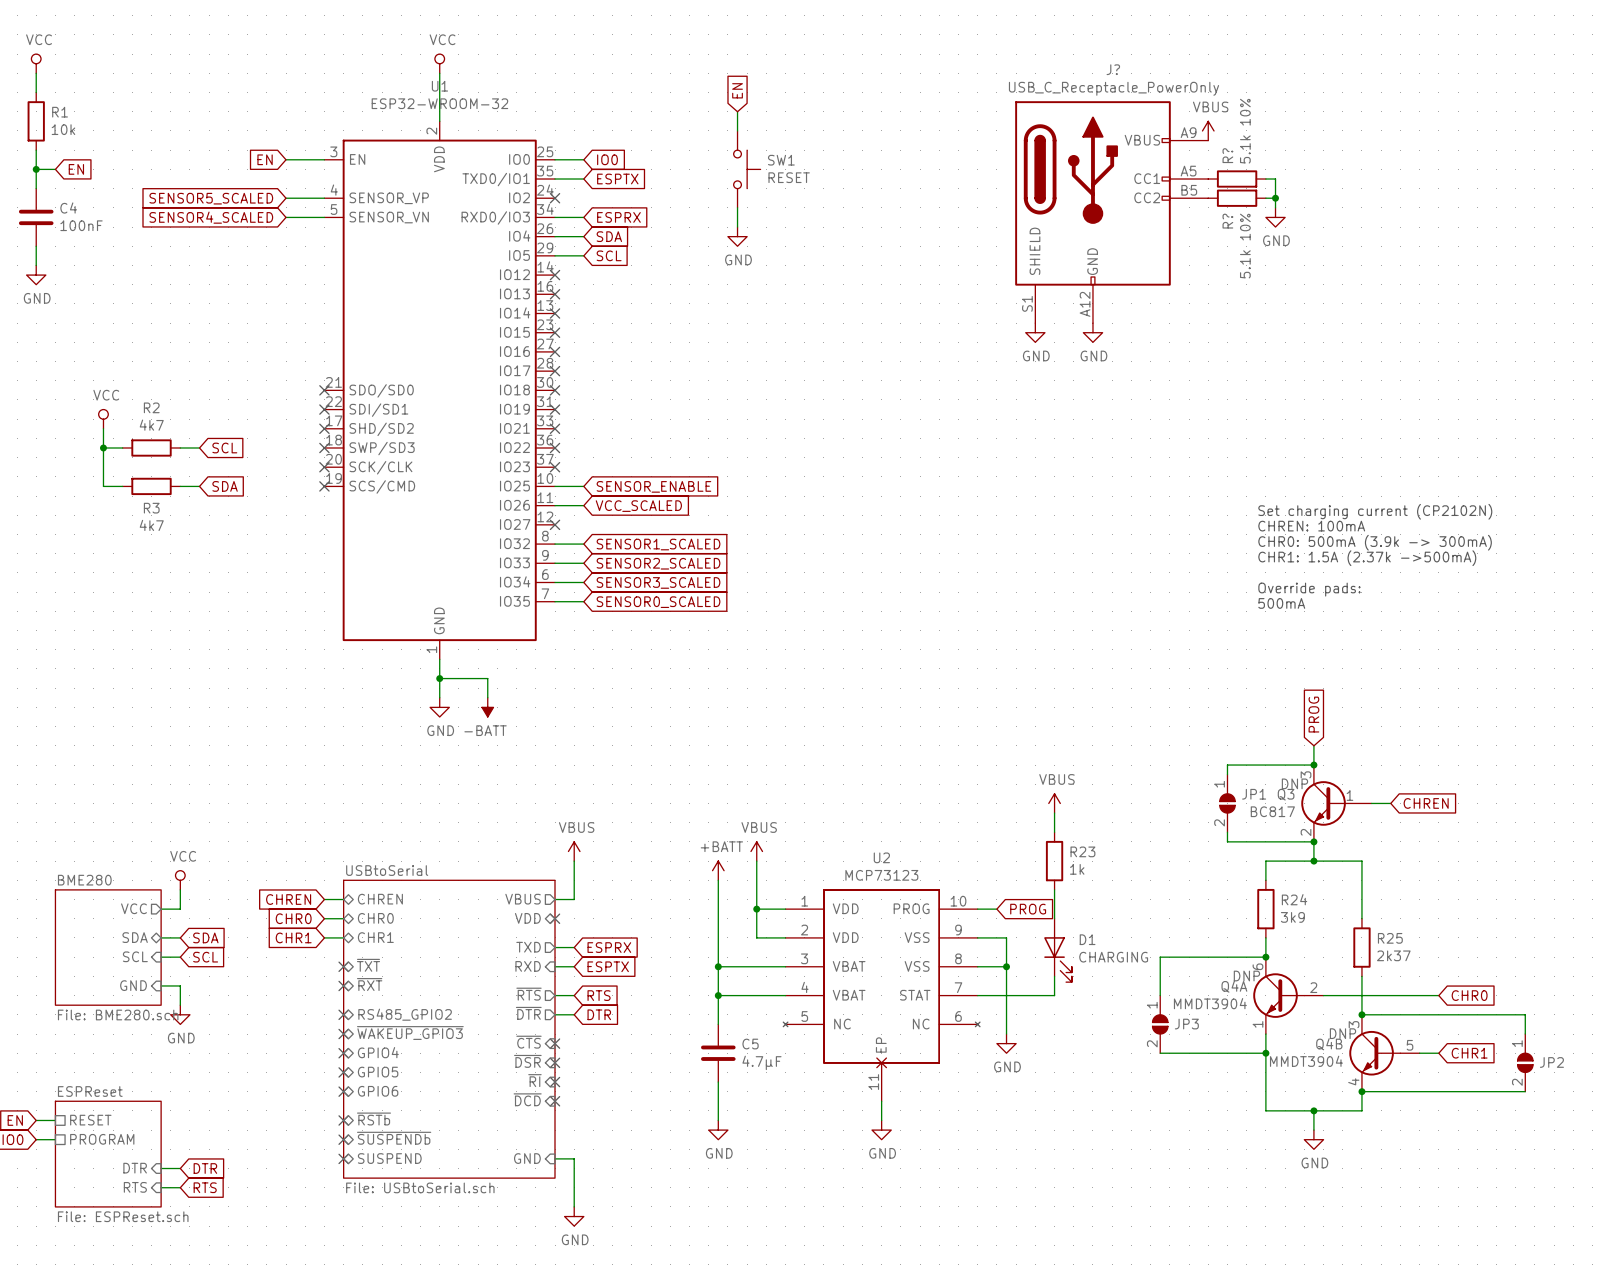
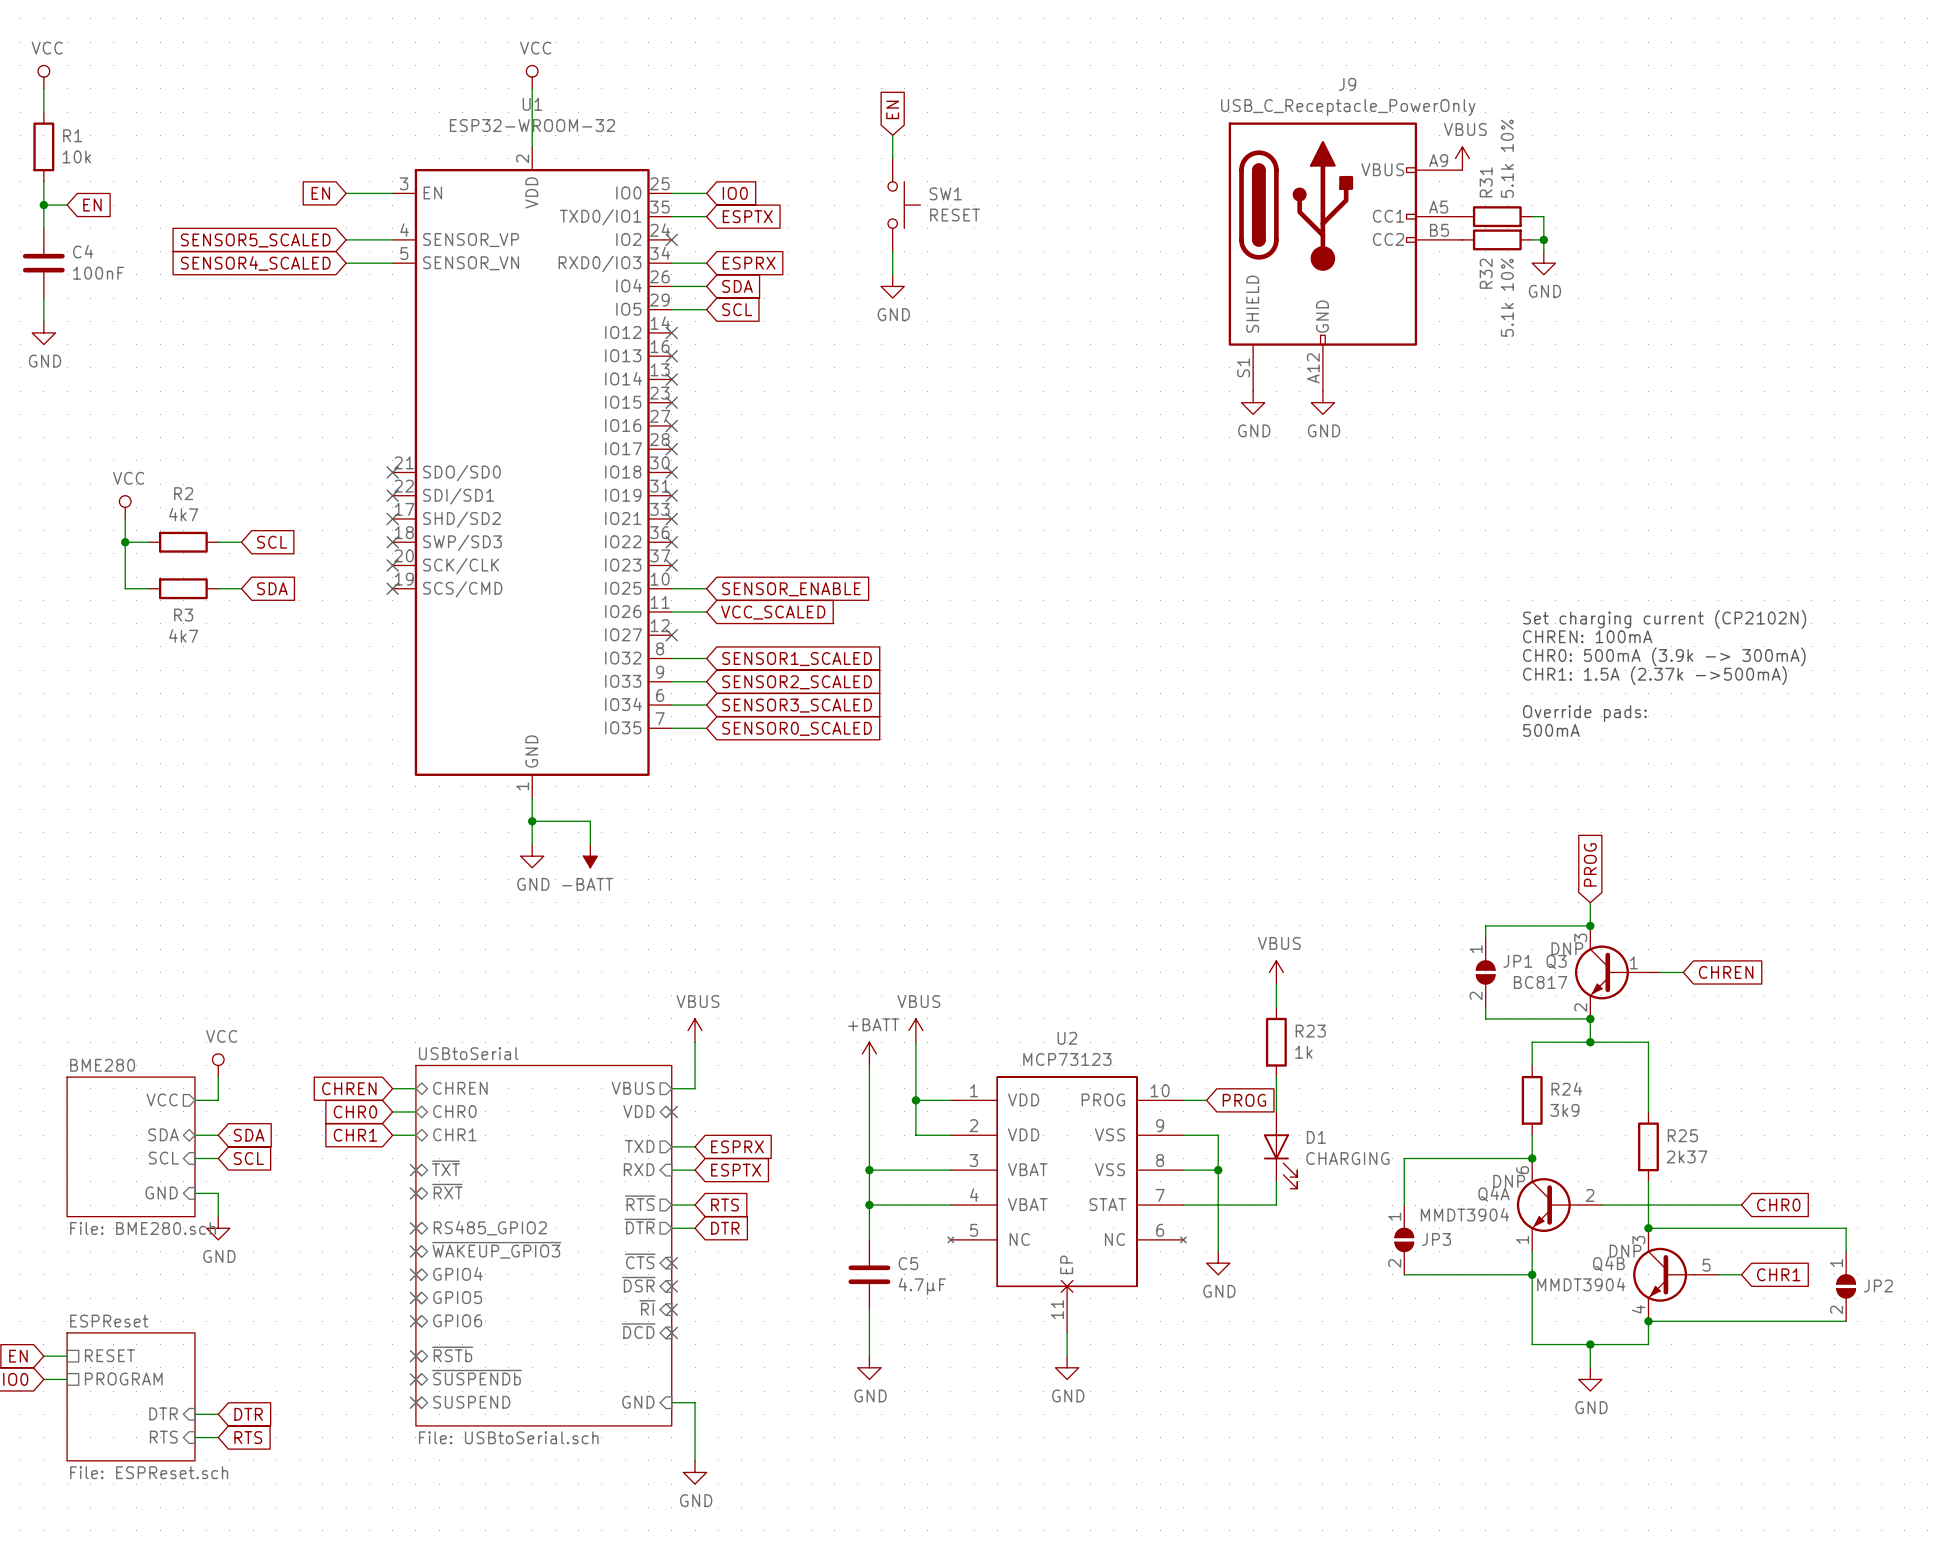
J? name: J? (1113, 69) -> J9 (1347, 84)
R? name: R? (1227, 155) -> R31 (1486, 182)
R? name: R? (1227, 221) -> R32 (1486, 273)

